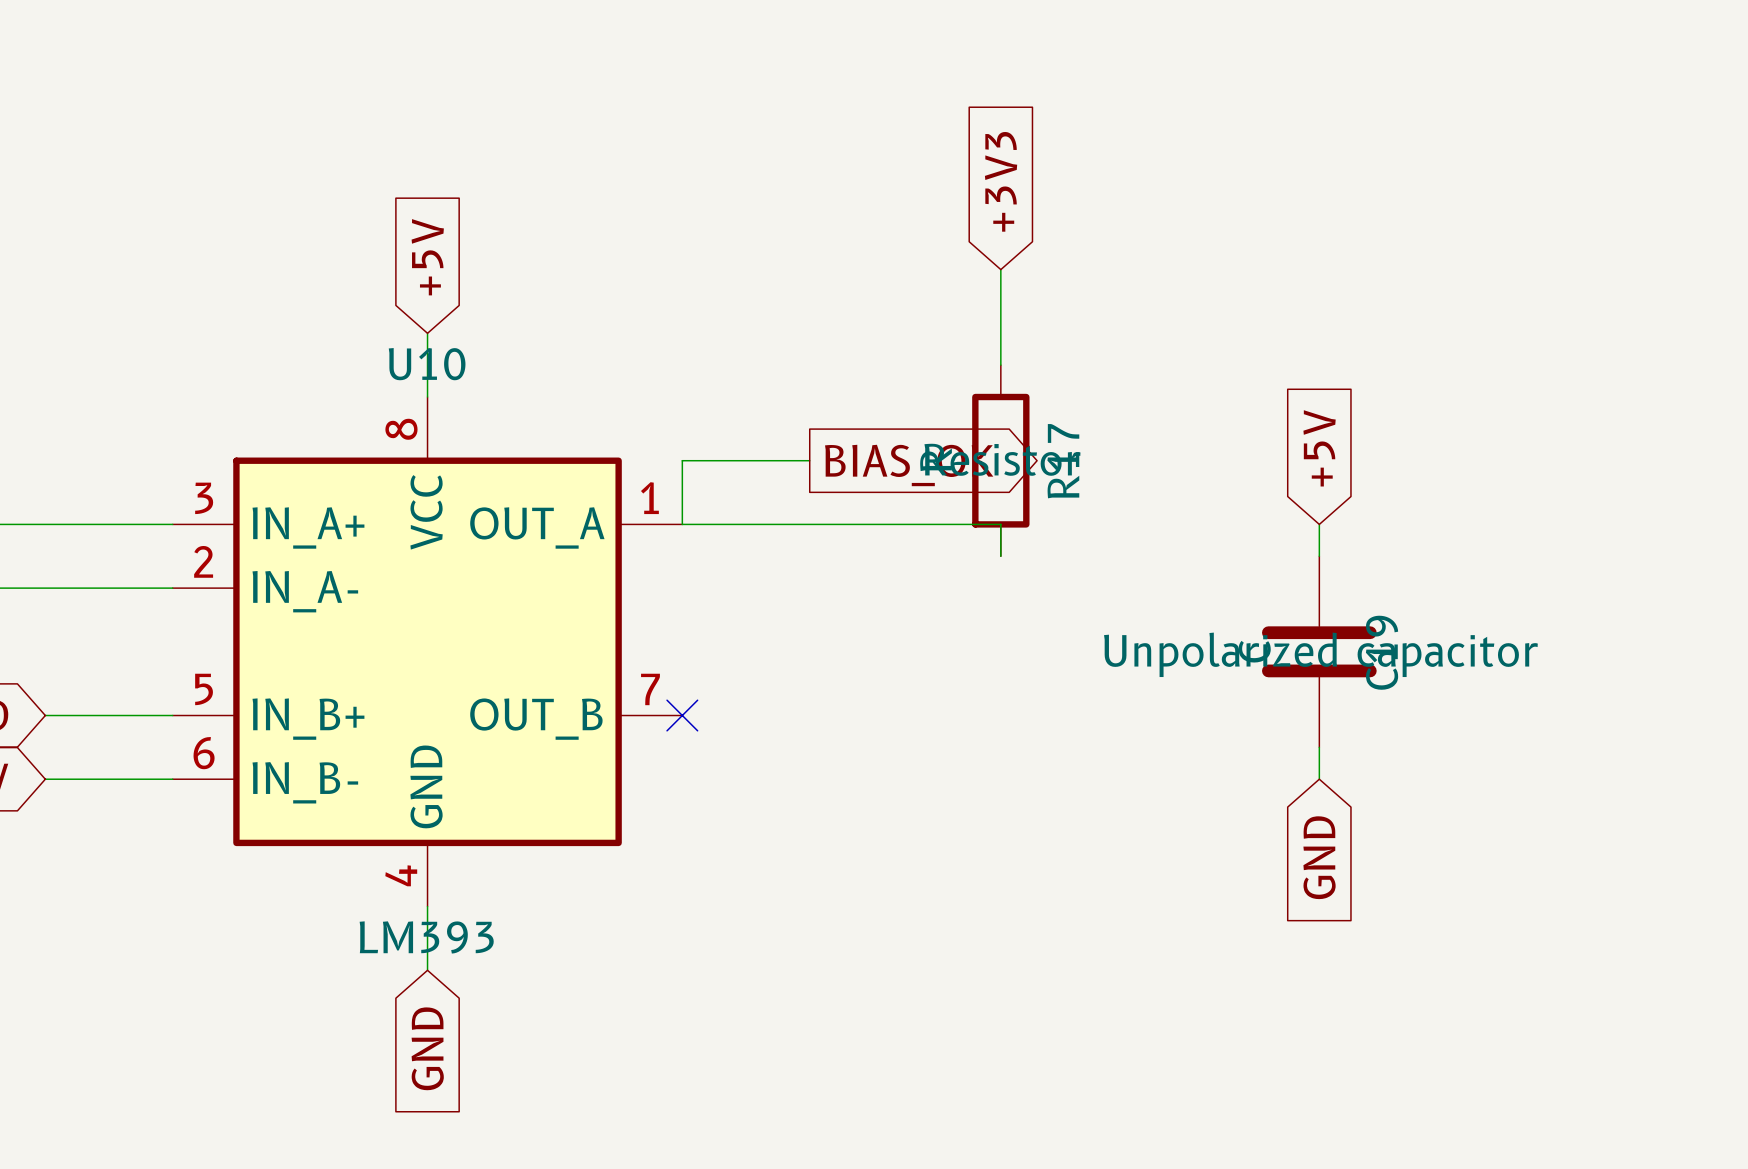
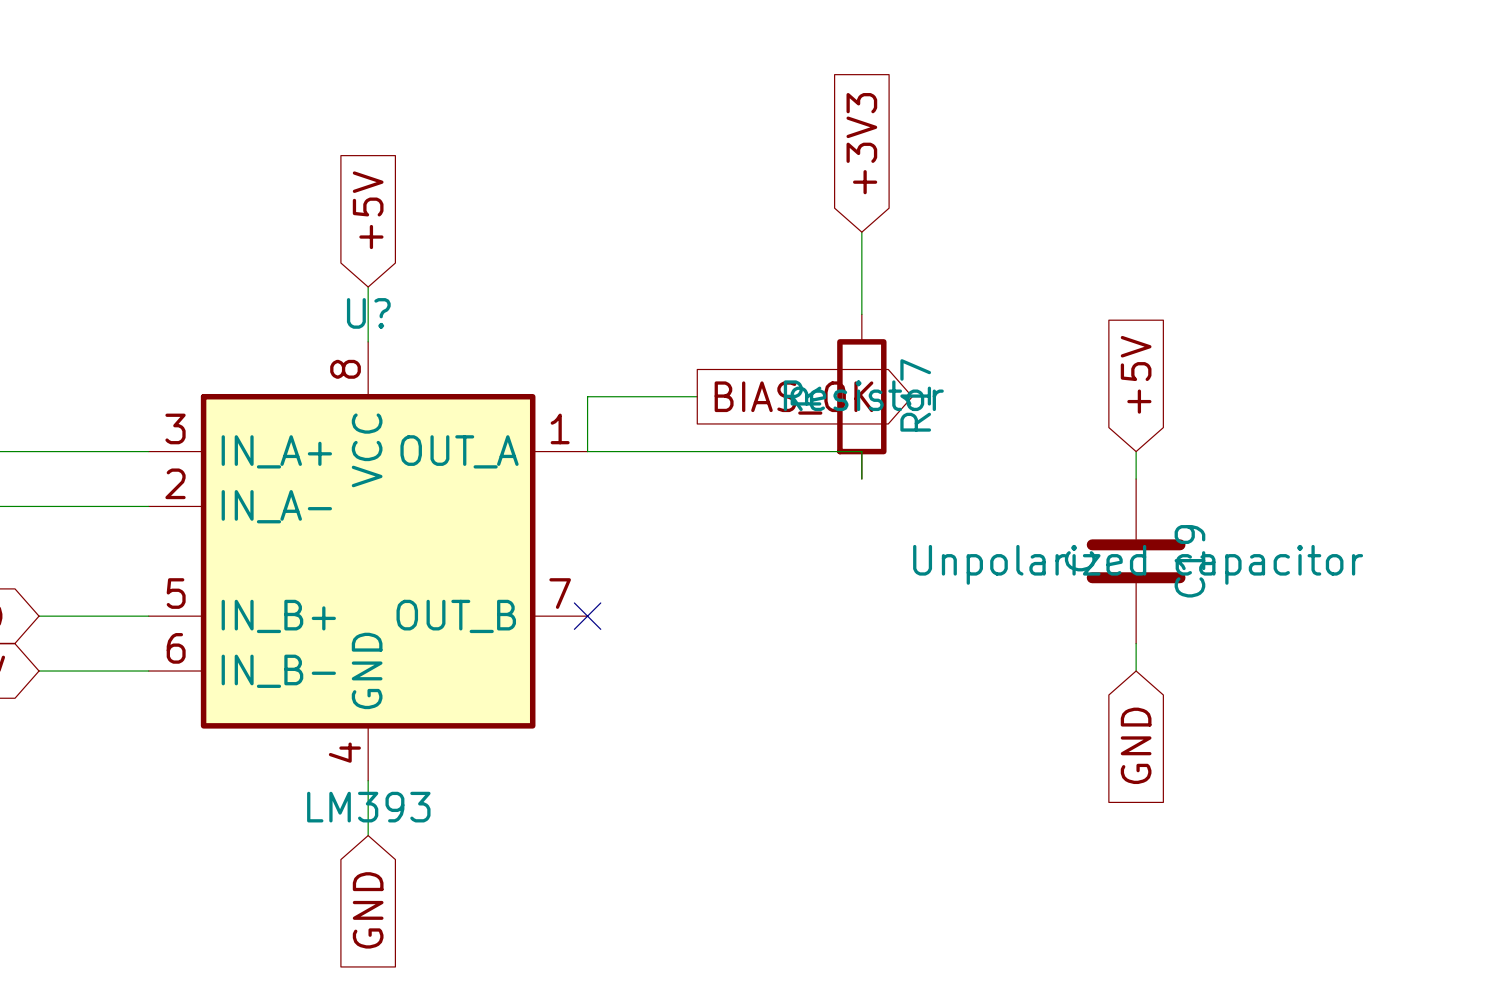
U10 name: U10 (427, 364) -> U? (368, 313)

